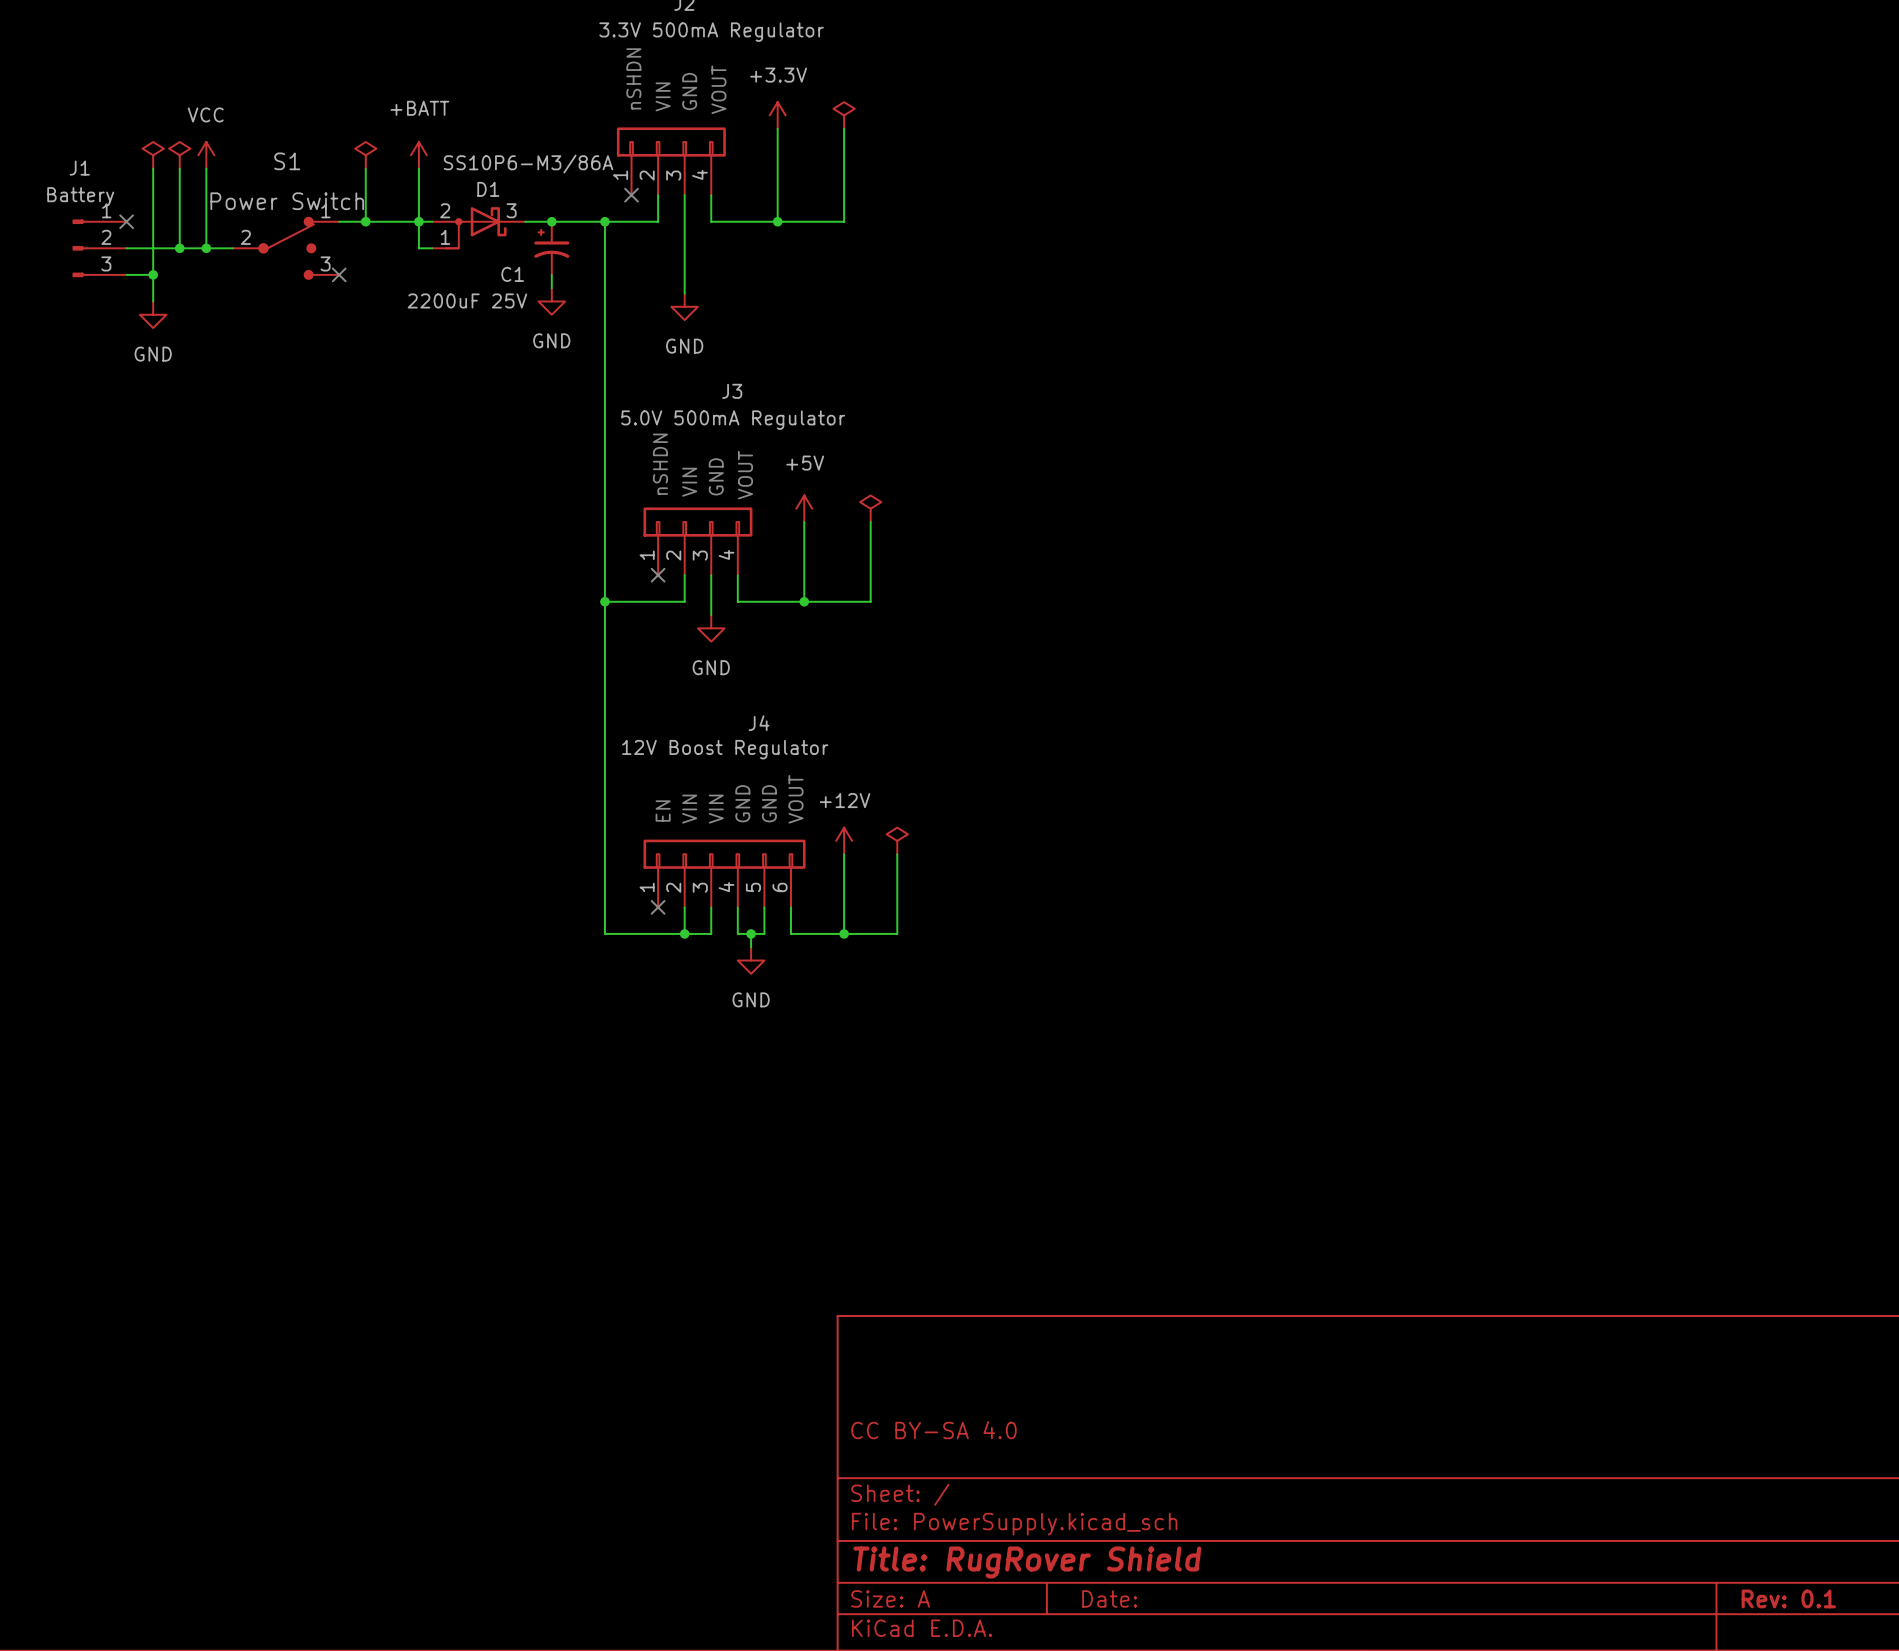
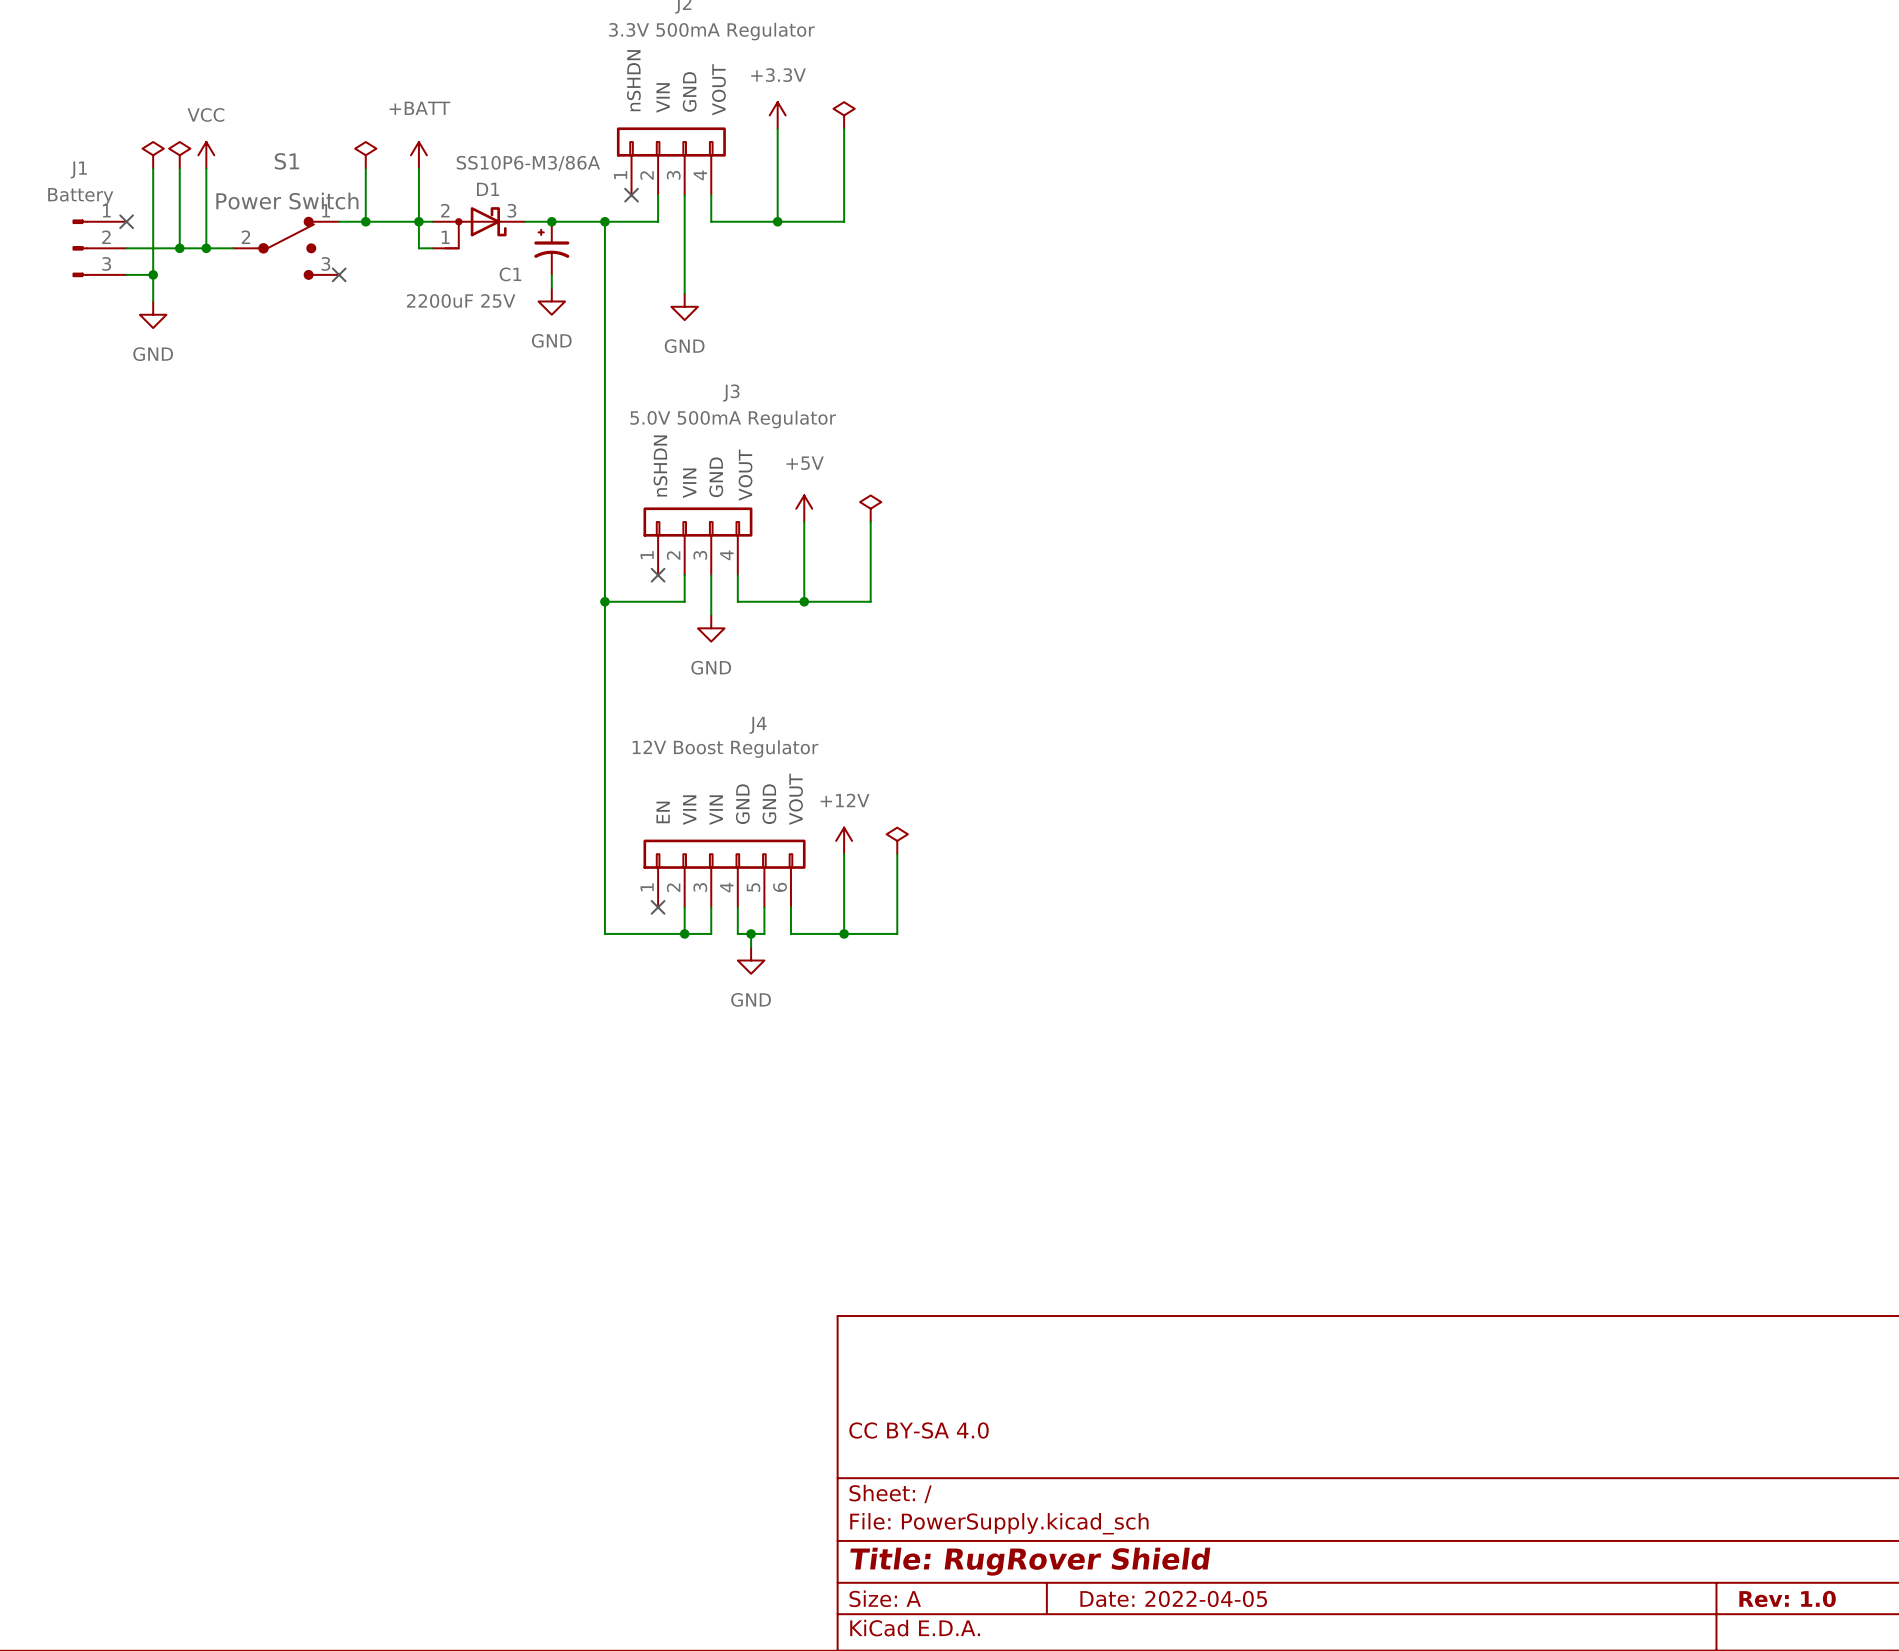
title block: Date: (1109, 1598) -> Date: 2022-04-05 (1173, 1598)
title block: Rev: 0.1 (1788, 1598) -> Rev: 1.0 (1787, 1598)

